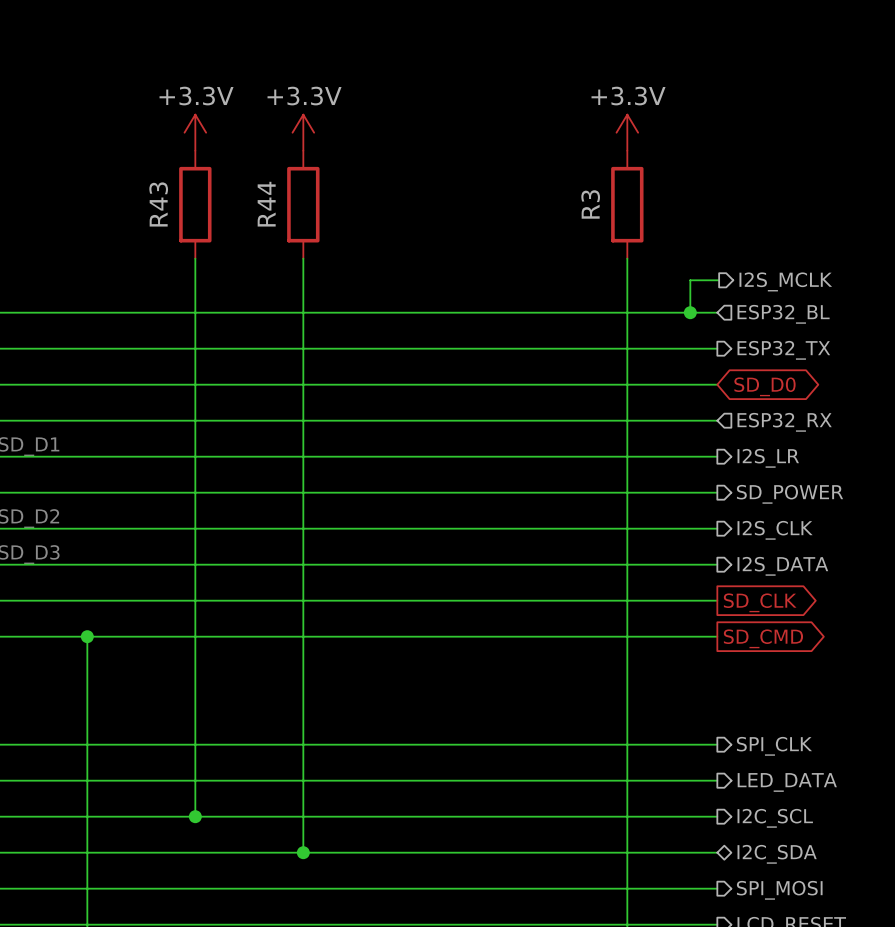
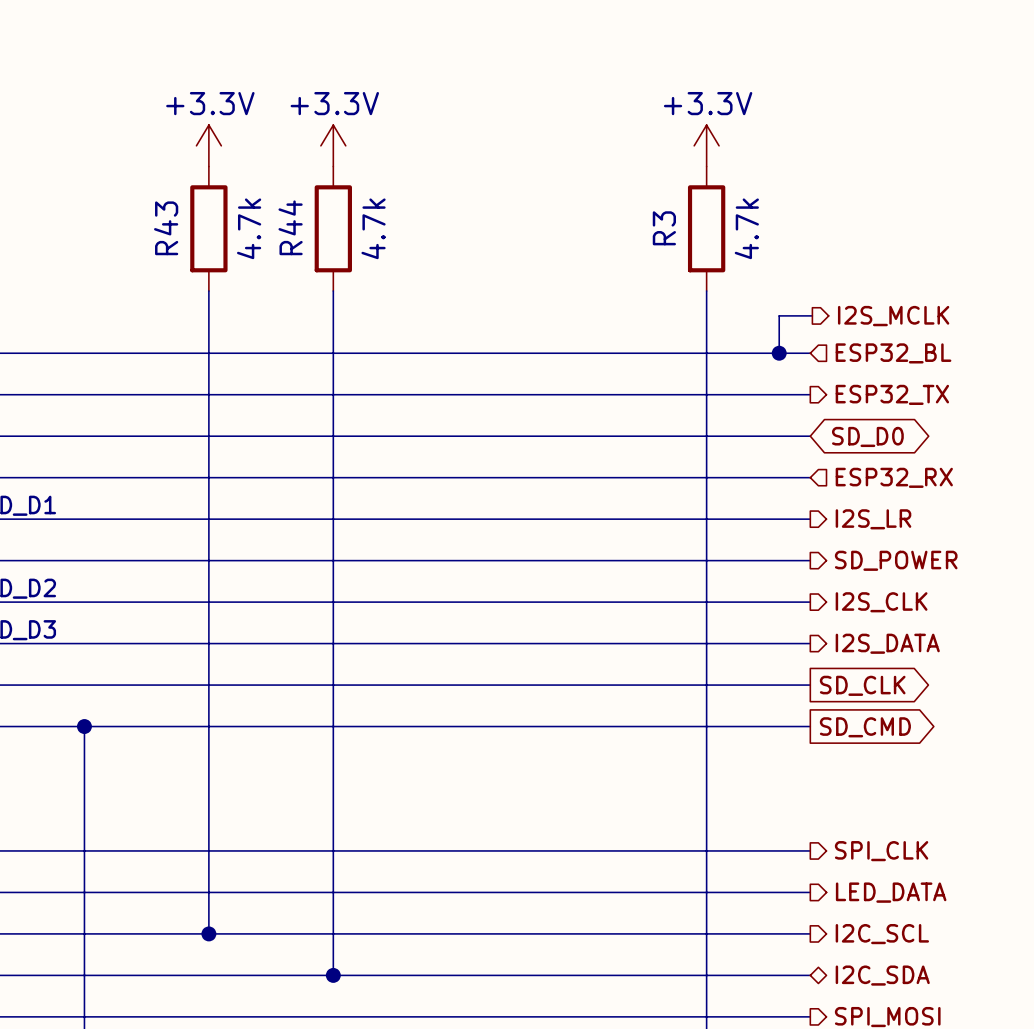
R43 value: none -> 4.7k (249, 228)
R44 value: none -> 4.7k (373, 228)
R3 value: none -> 4.7k (746, 228)

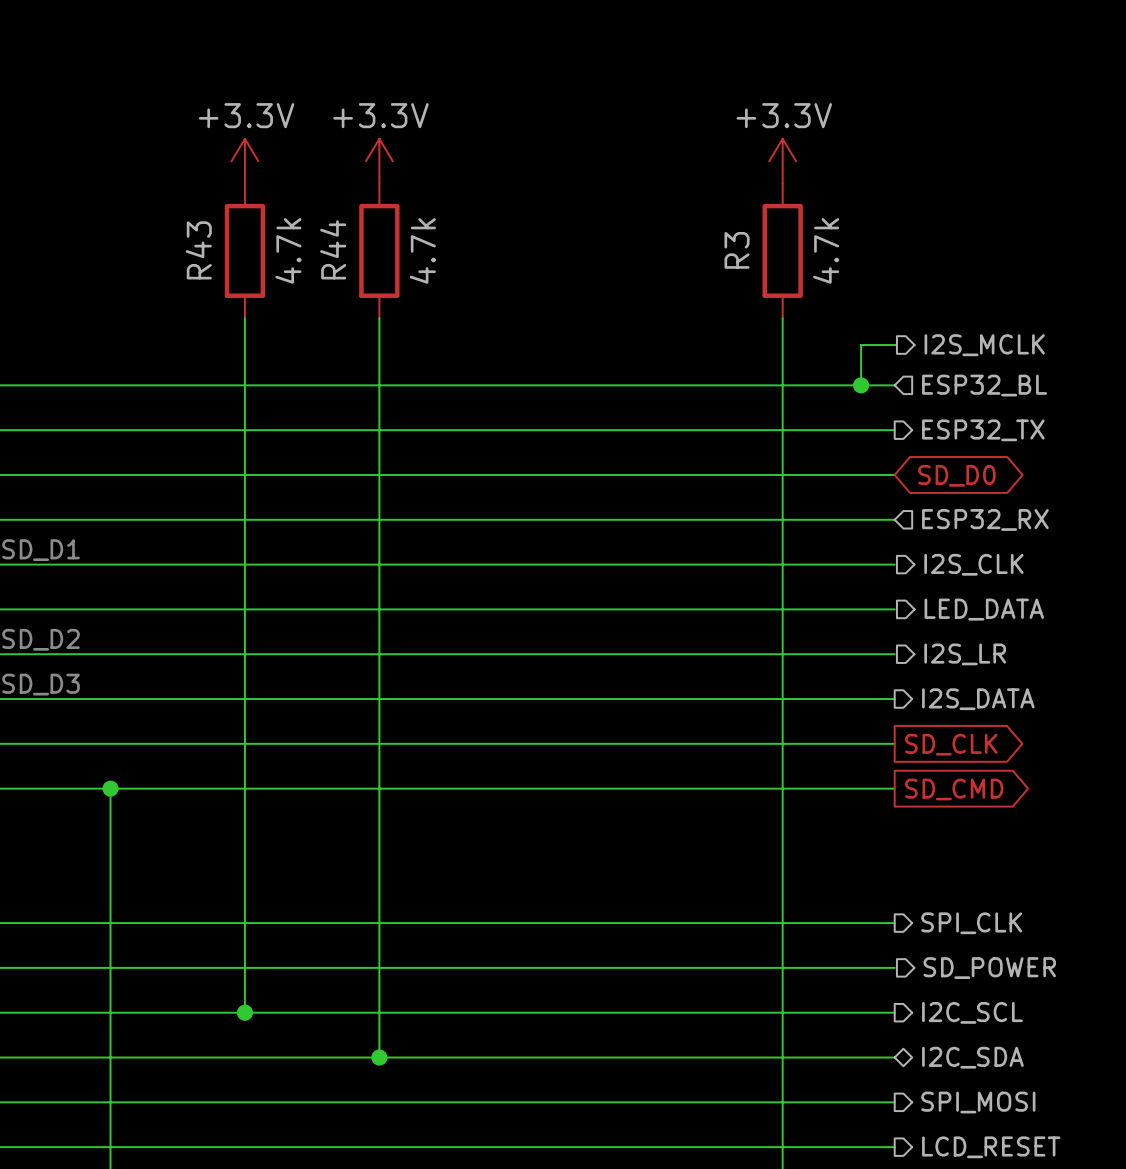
hierarchical label: I2S_LR (873, 519) -> I2S_CLK (973, 564)
hierarchical label: SD_POWER (896, 560) -> LED_DATA (984, 609)
hierarchical label: I2S_CLK (881, 602) -> I2S_LR (965, 654)
hierarchical label: LED_DATA (891, 892) -> SD_POWER (989, 968)

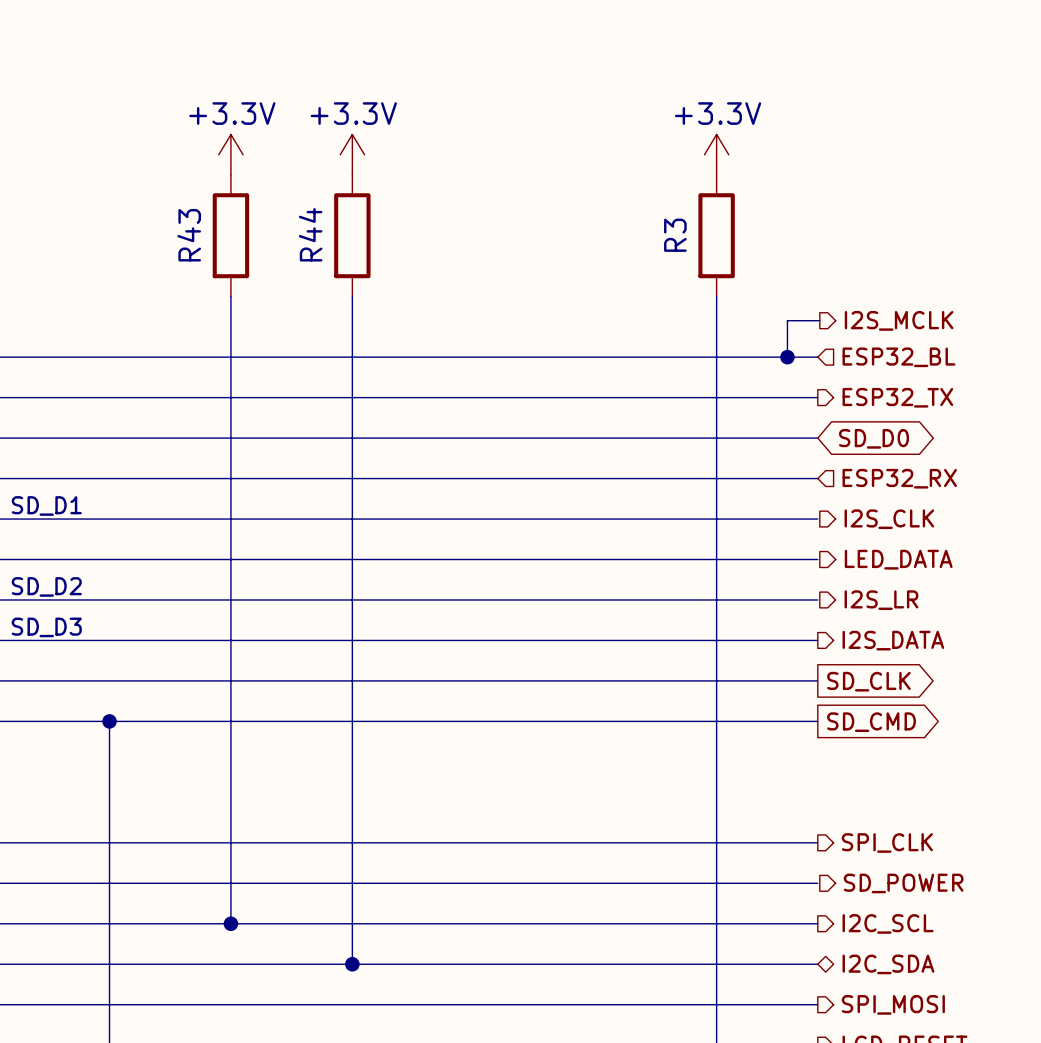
R43 value: 4.7k (288, 250) -> none
R44 value: 4.7k (422, 250) -> none
R3 value: 4.7k (826, 250) -> none

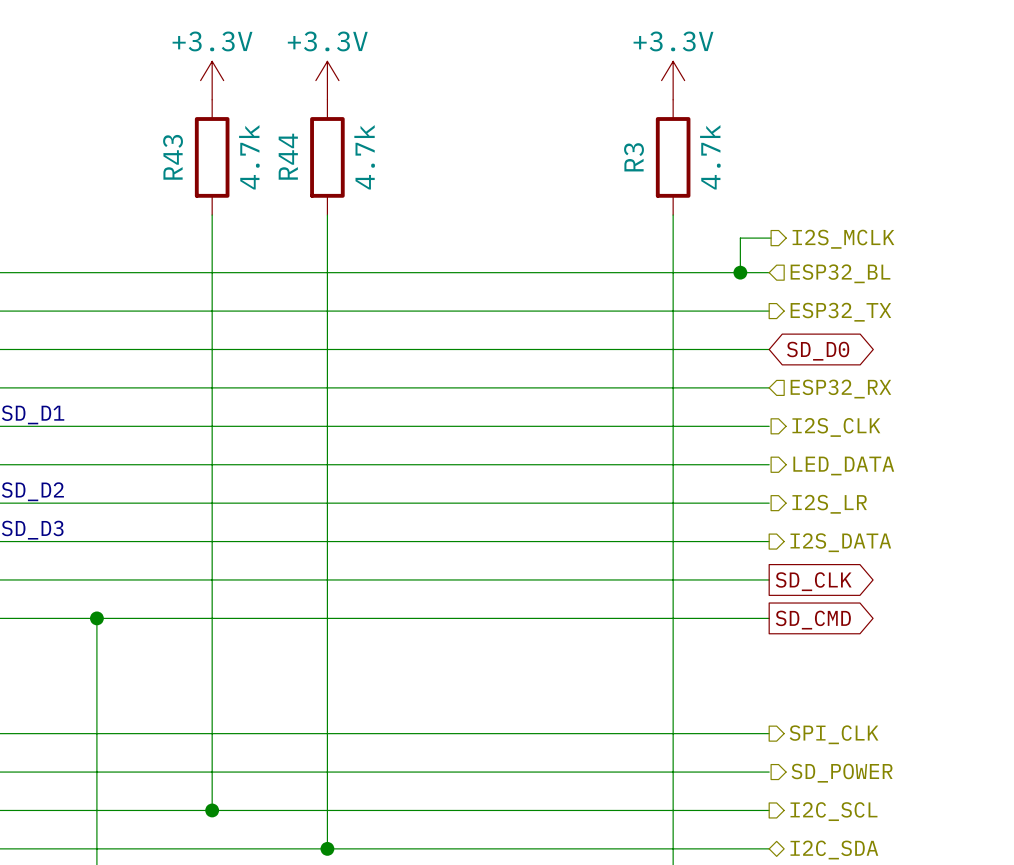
R43 value: none -> 4.7k (249, 157)
R44 value: none -> 4.7k (364, 157)
R3 value: none -> 4.7k (710, 157)

